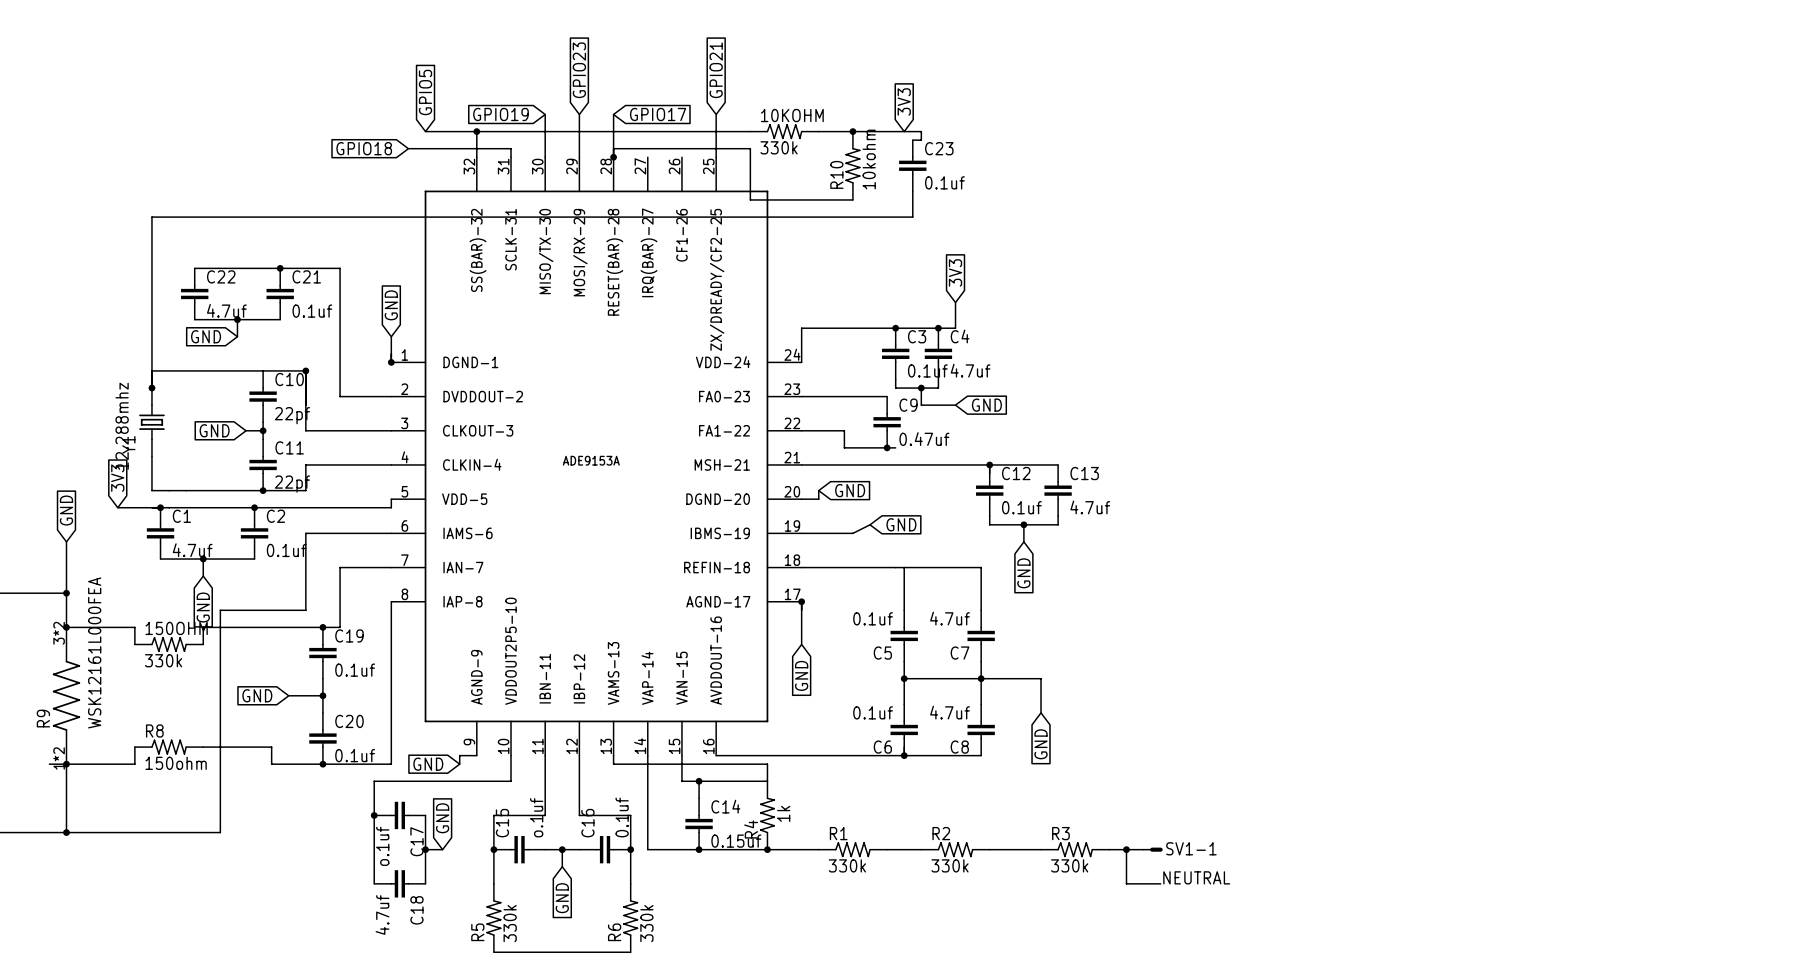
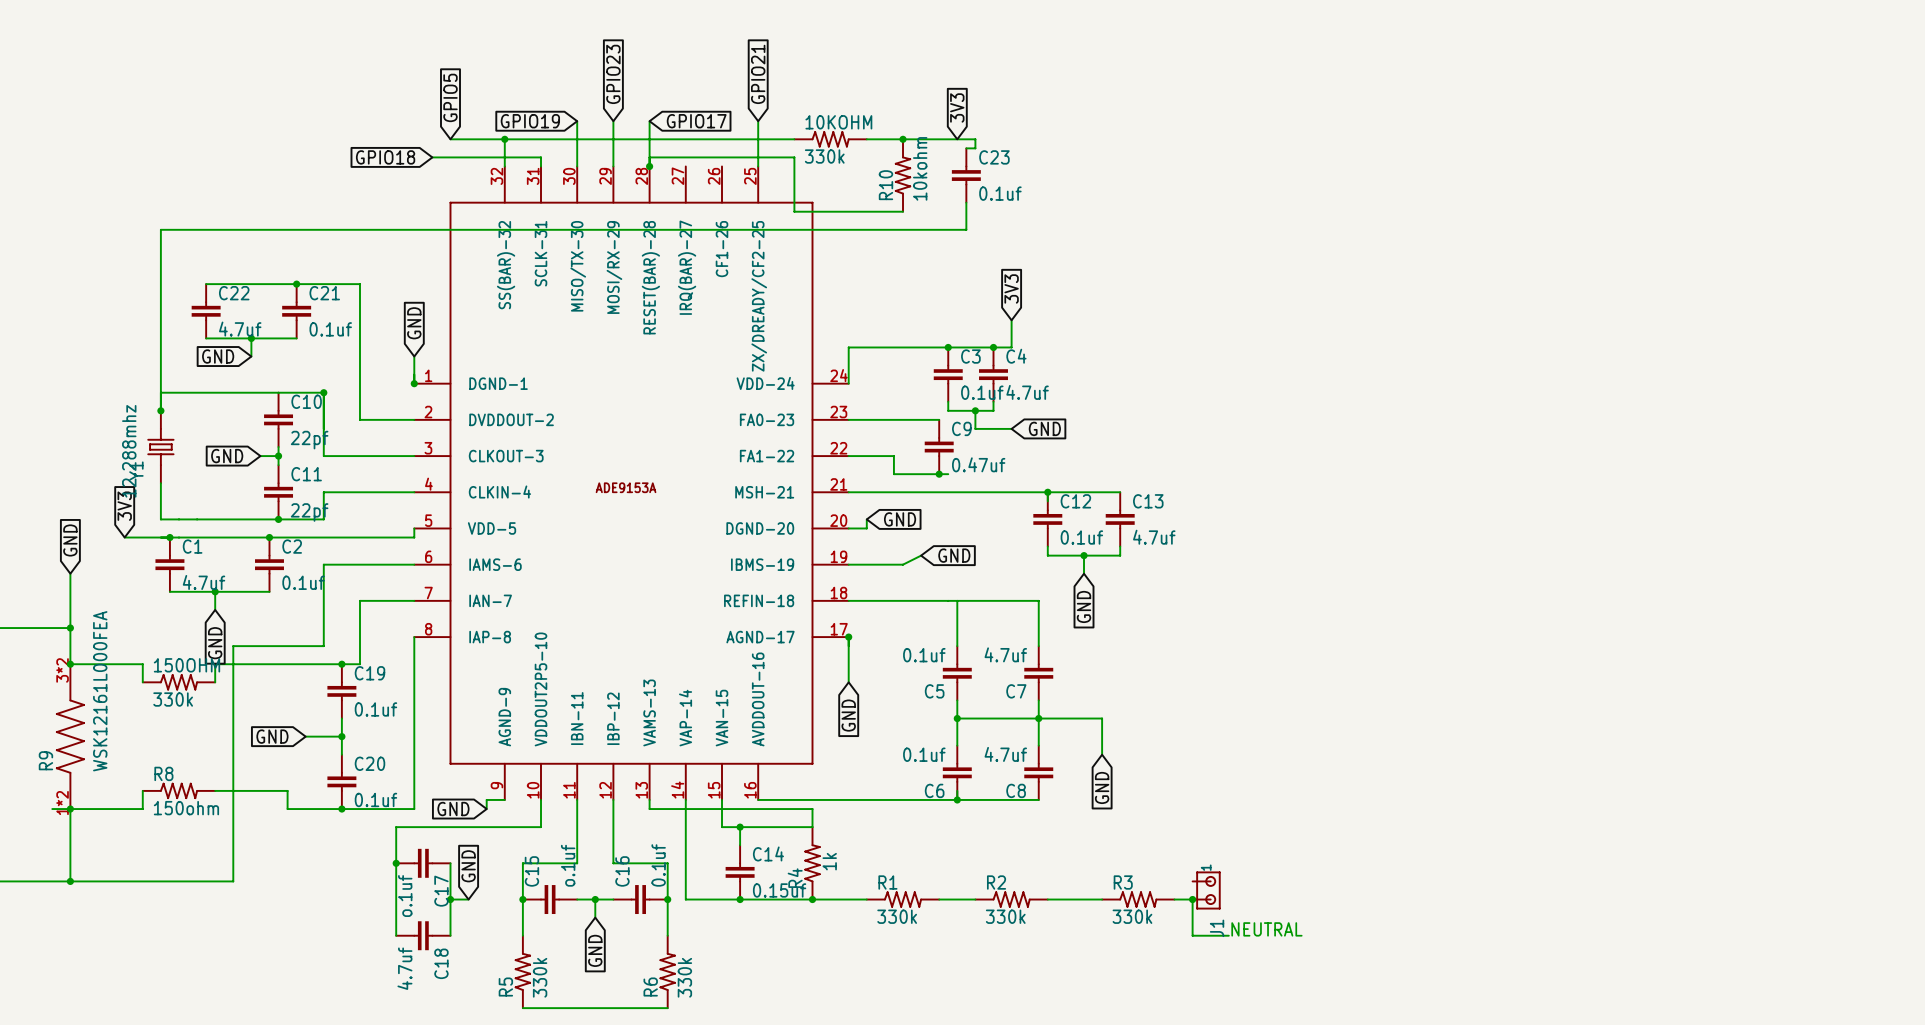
J1: none -> (1206, 890)
SV1-1: (1144, 849) -> none

